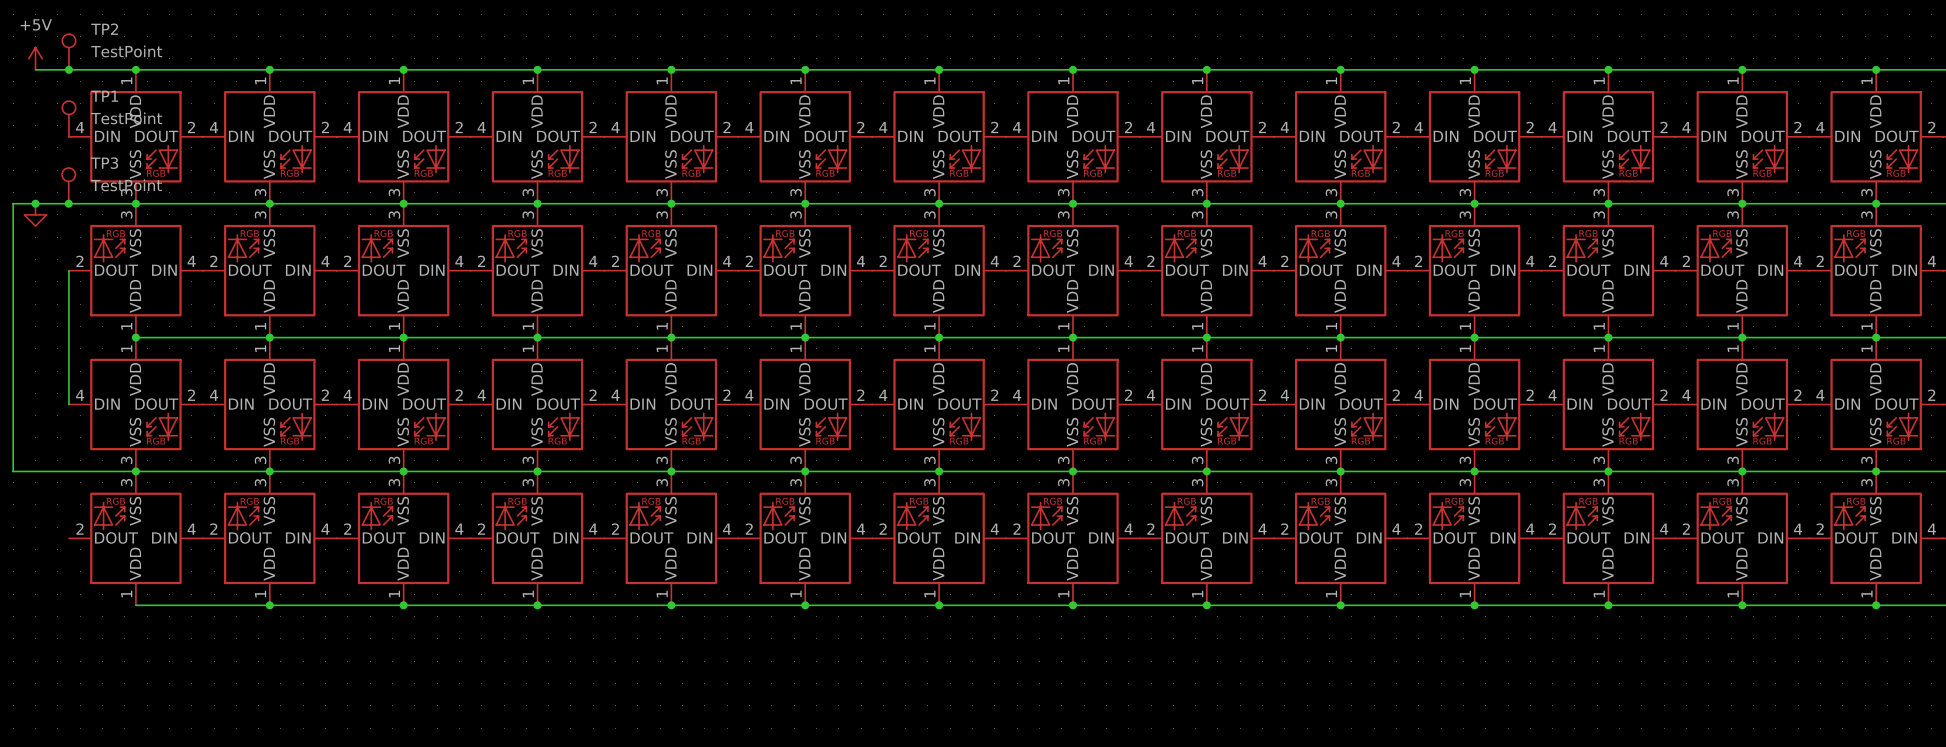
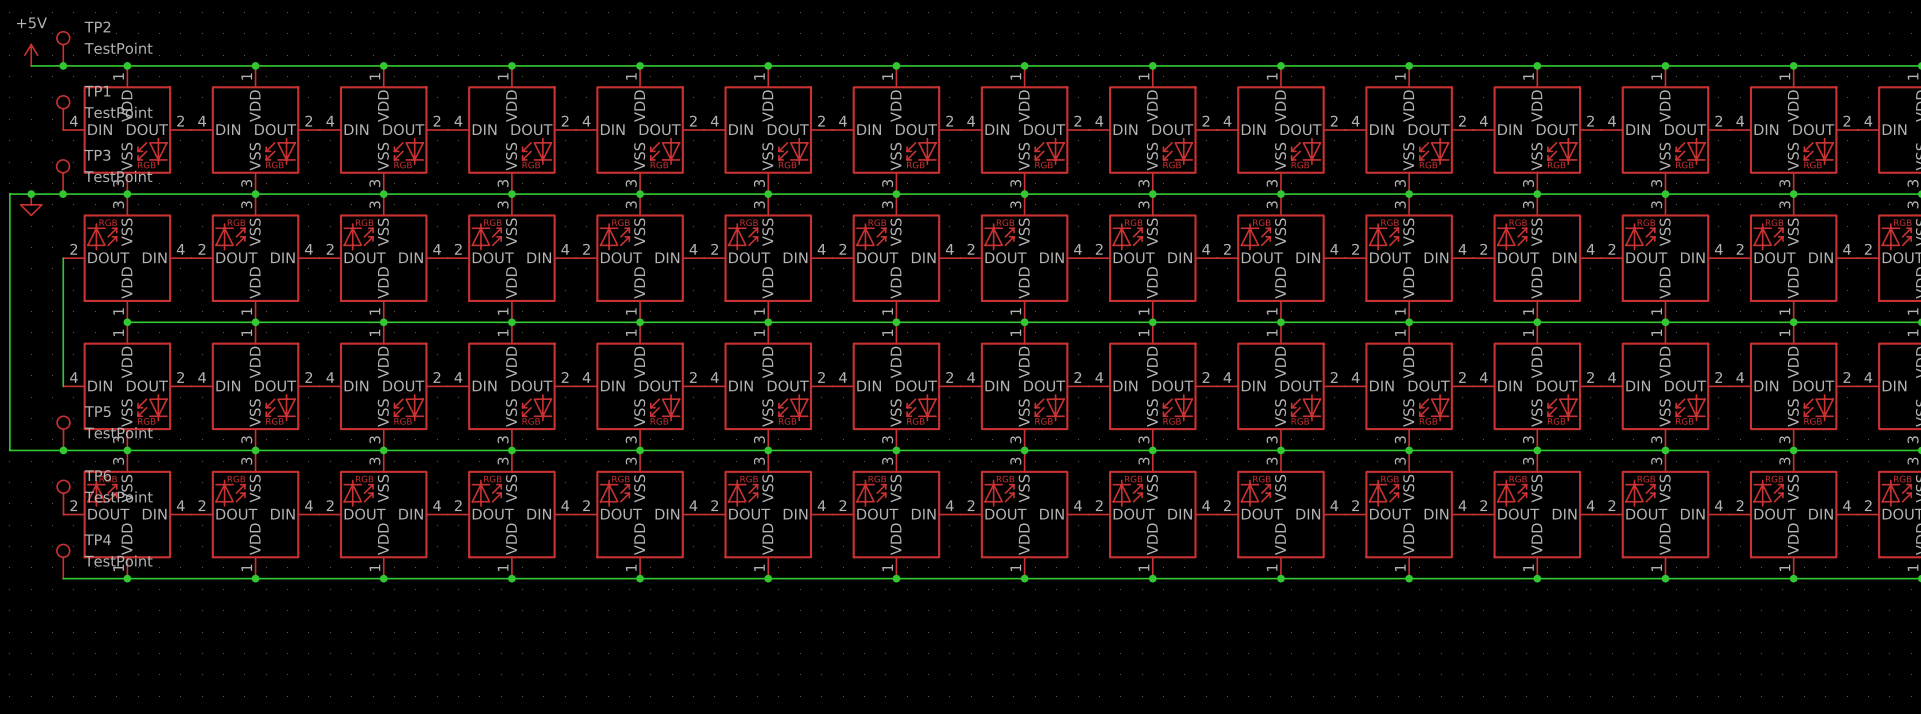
TP5: none -> TestPoint (63, 433)
junction: none -> (63, 450)
TP6: none -> TestPoint (63, 497)
TP4: none -> TestPoint (63, 561)
wire: none -> (63, 578) (127, 578)
junction: none -> (127, 578)

